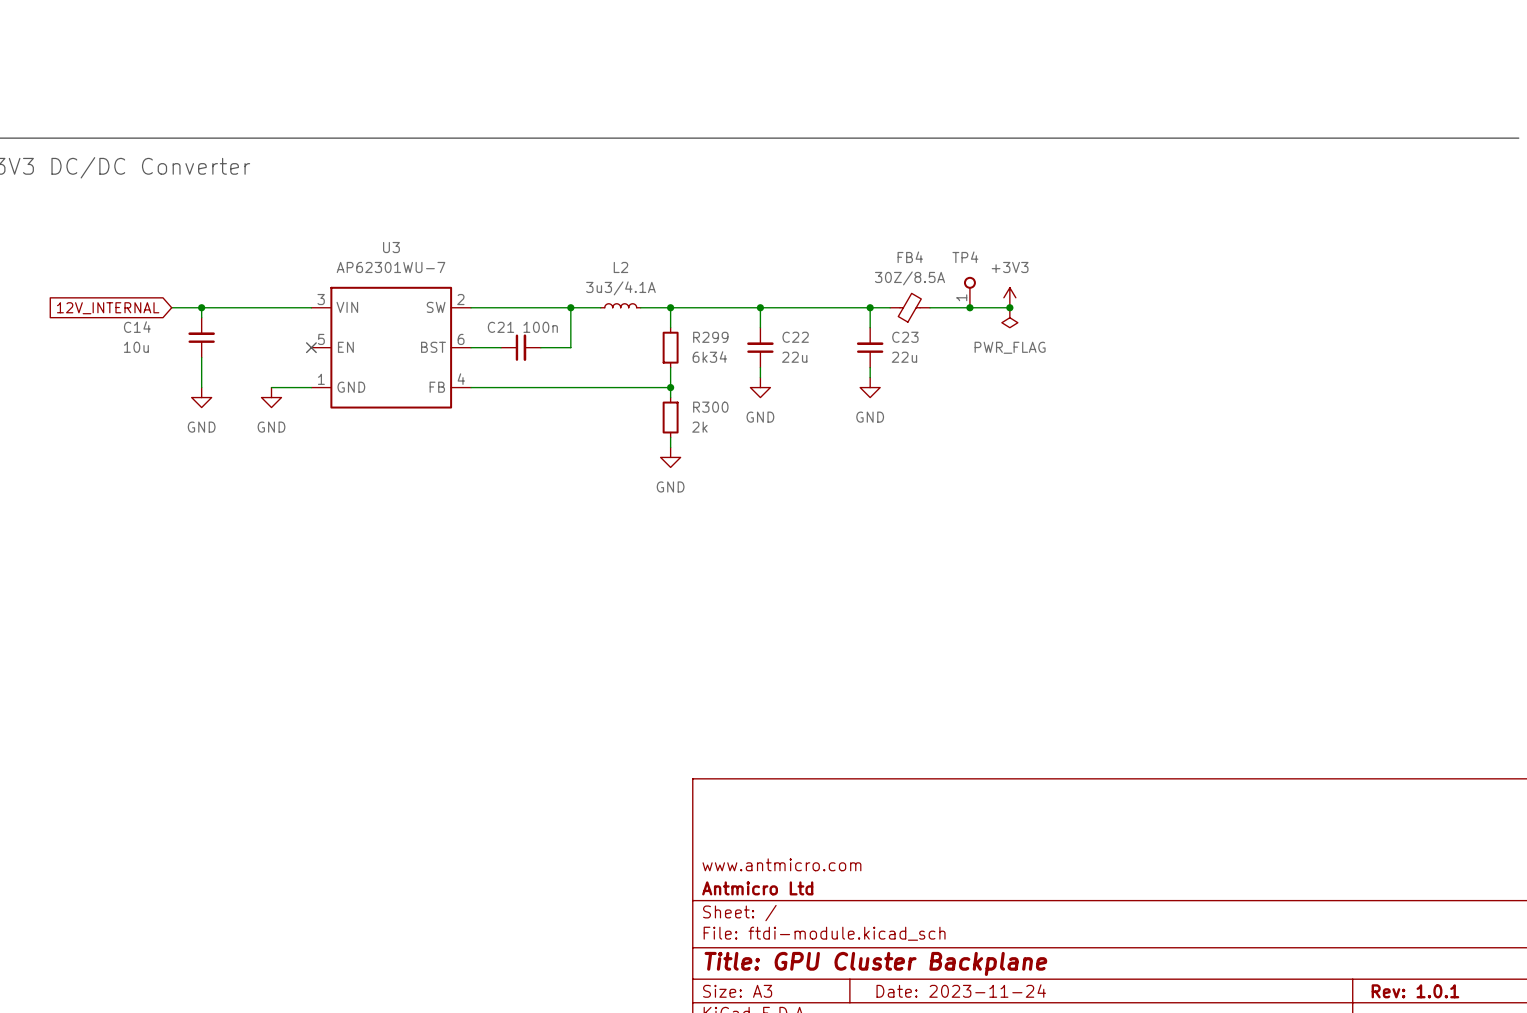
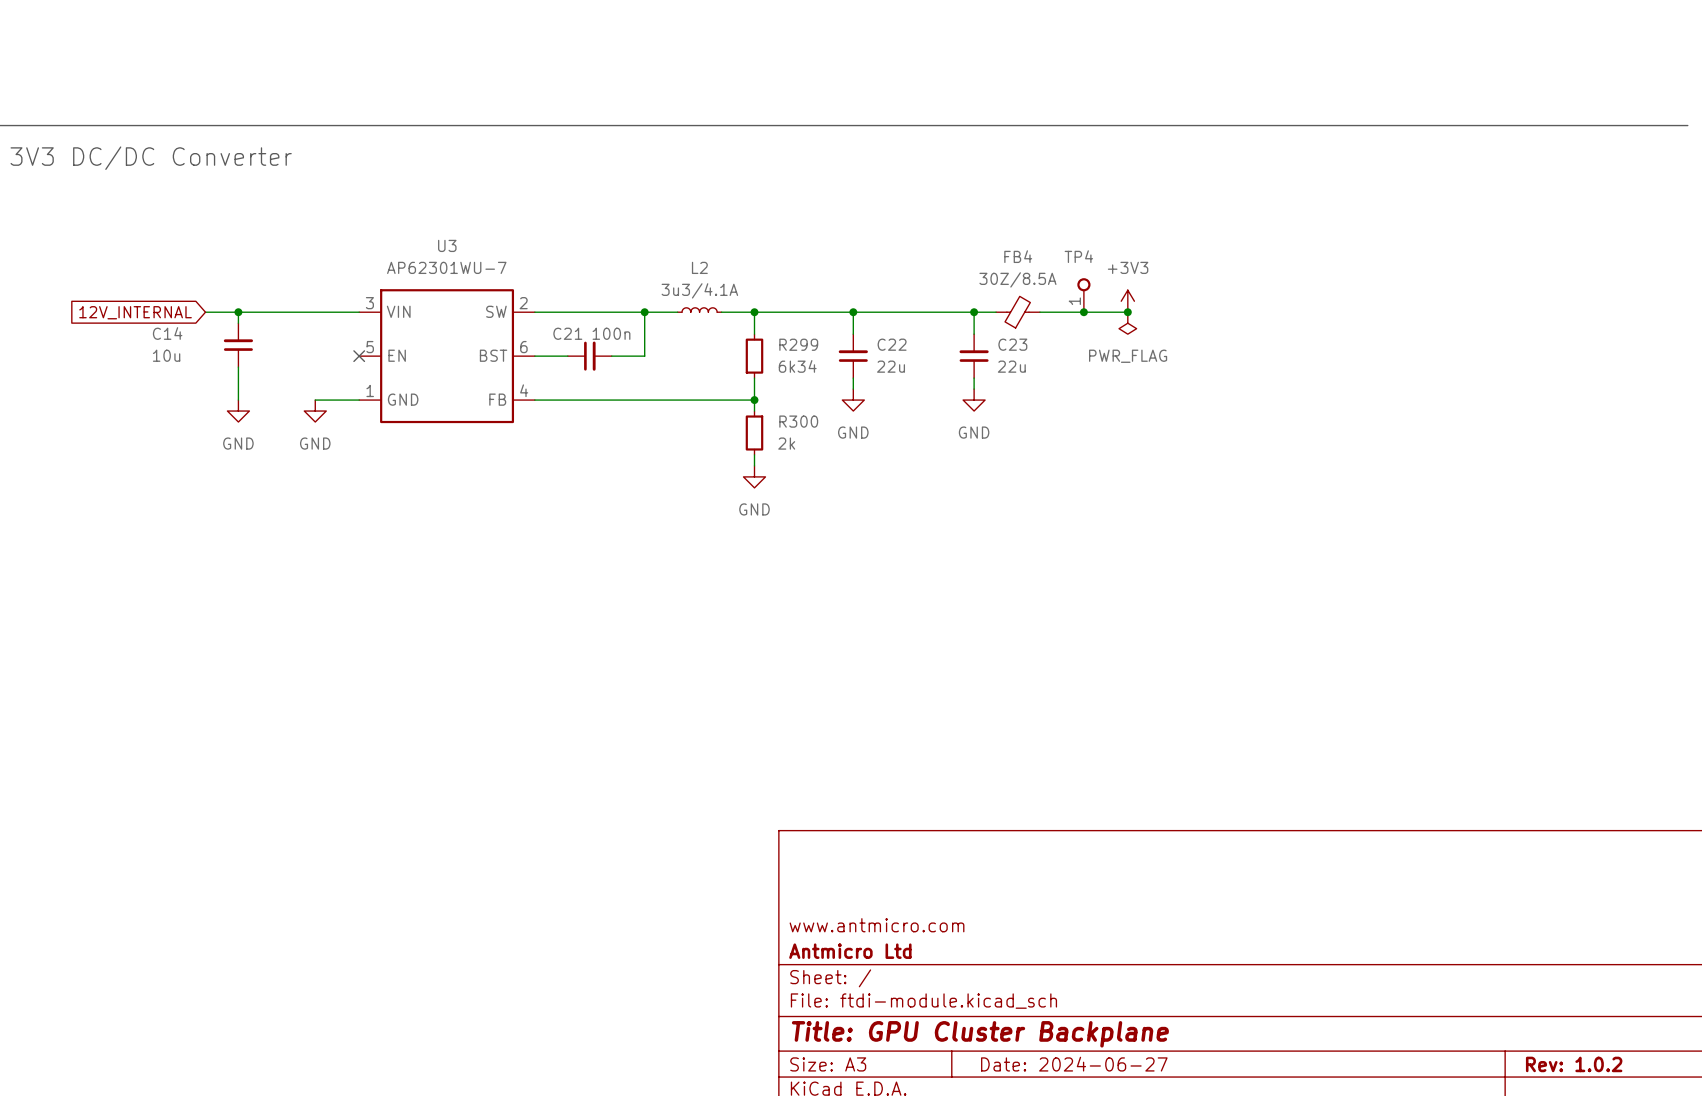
title block: Date: 2023-11-24 (961, 991) -> Date: 2024-06-27 (1074, 1064)
title block: Rev: 1.0.1 (1415, 991) -> Rev: 1.0.2 (1574, 1064)

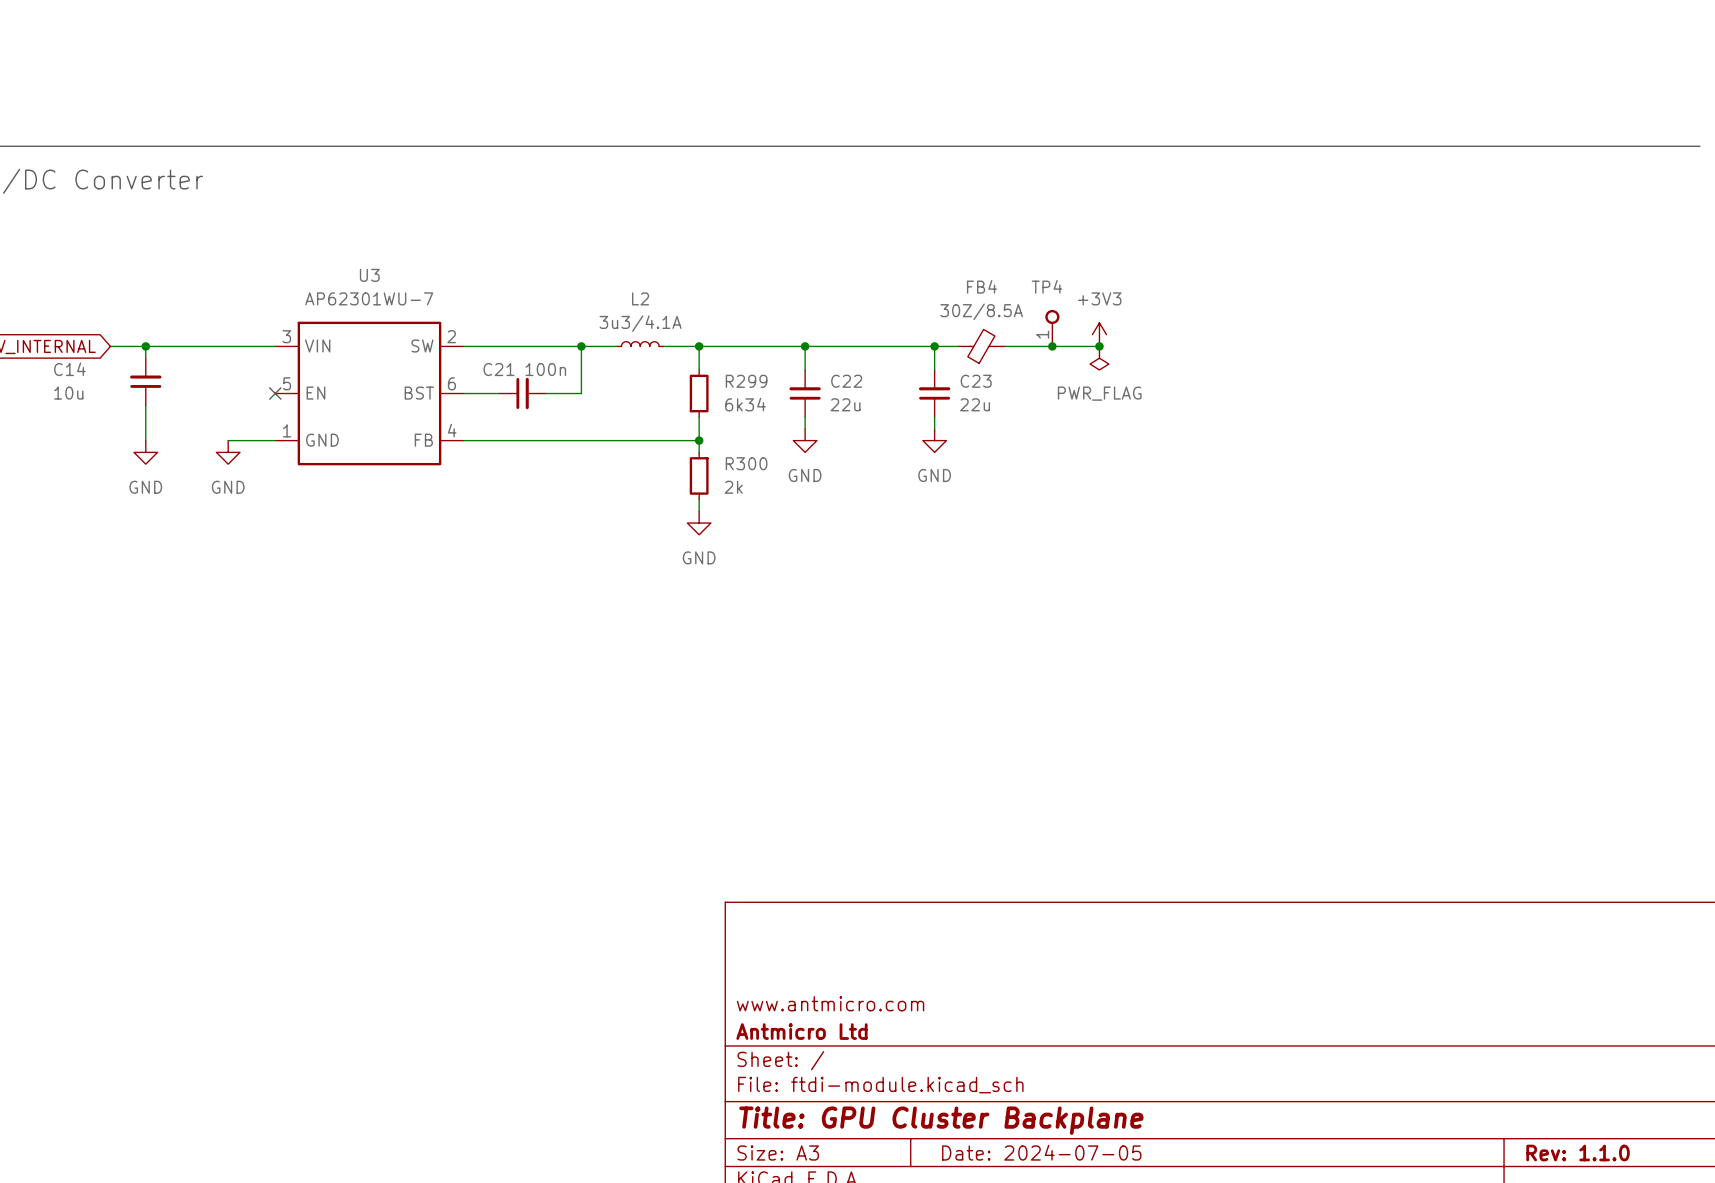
title block: Date: 2024-06-27 (1074, 1064) -> Date: 2024-07-05 (1041, 1152)
title block: Rev: 1.0.2 (1574, 1064) -> Rev: 1.1.0 (1578, 1153)

